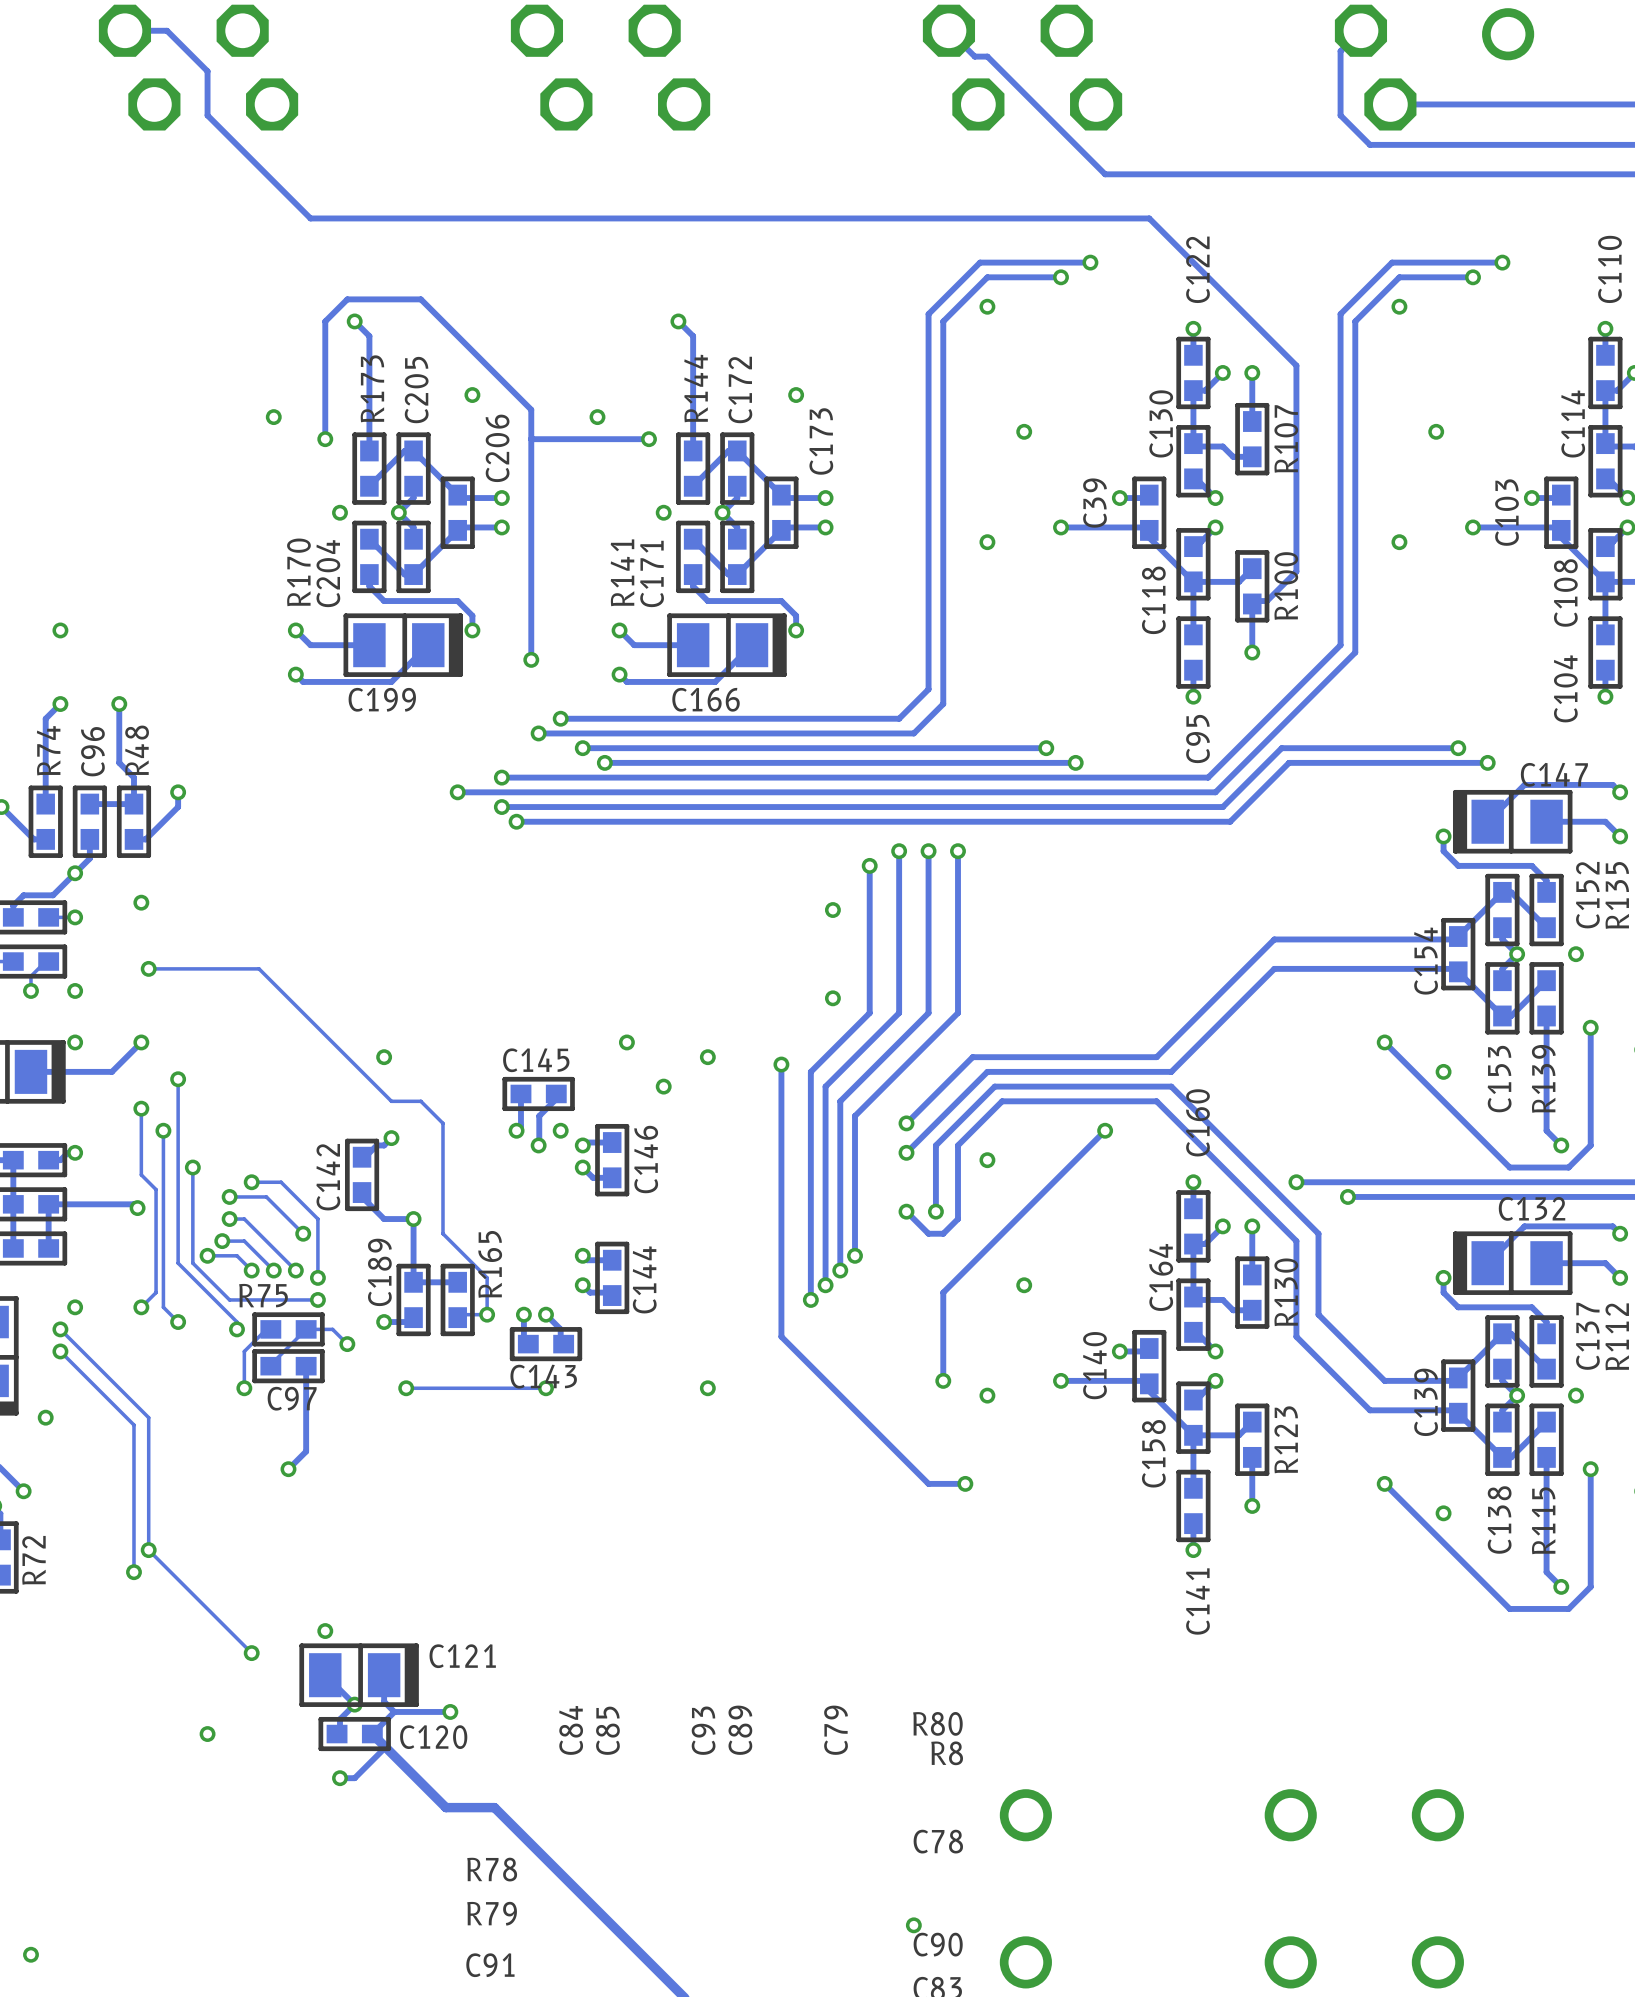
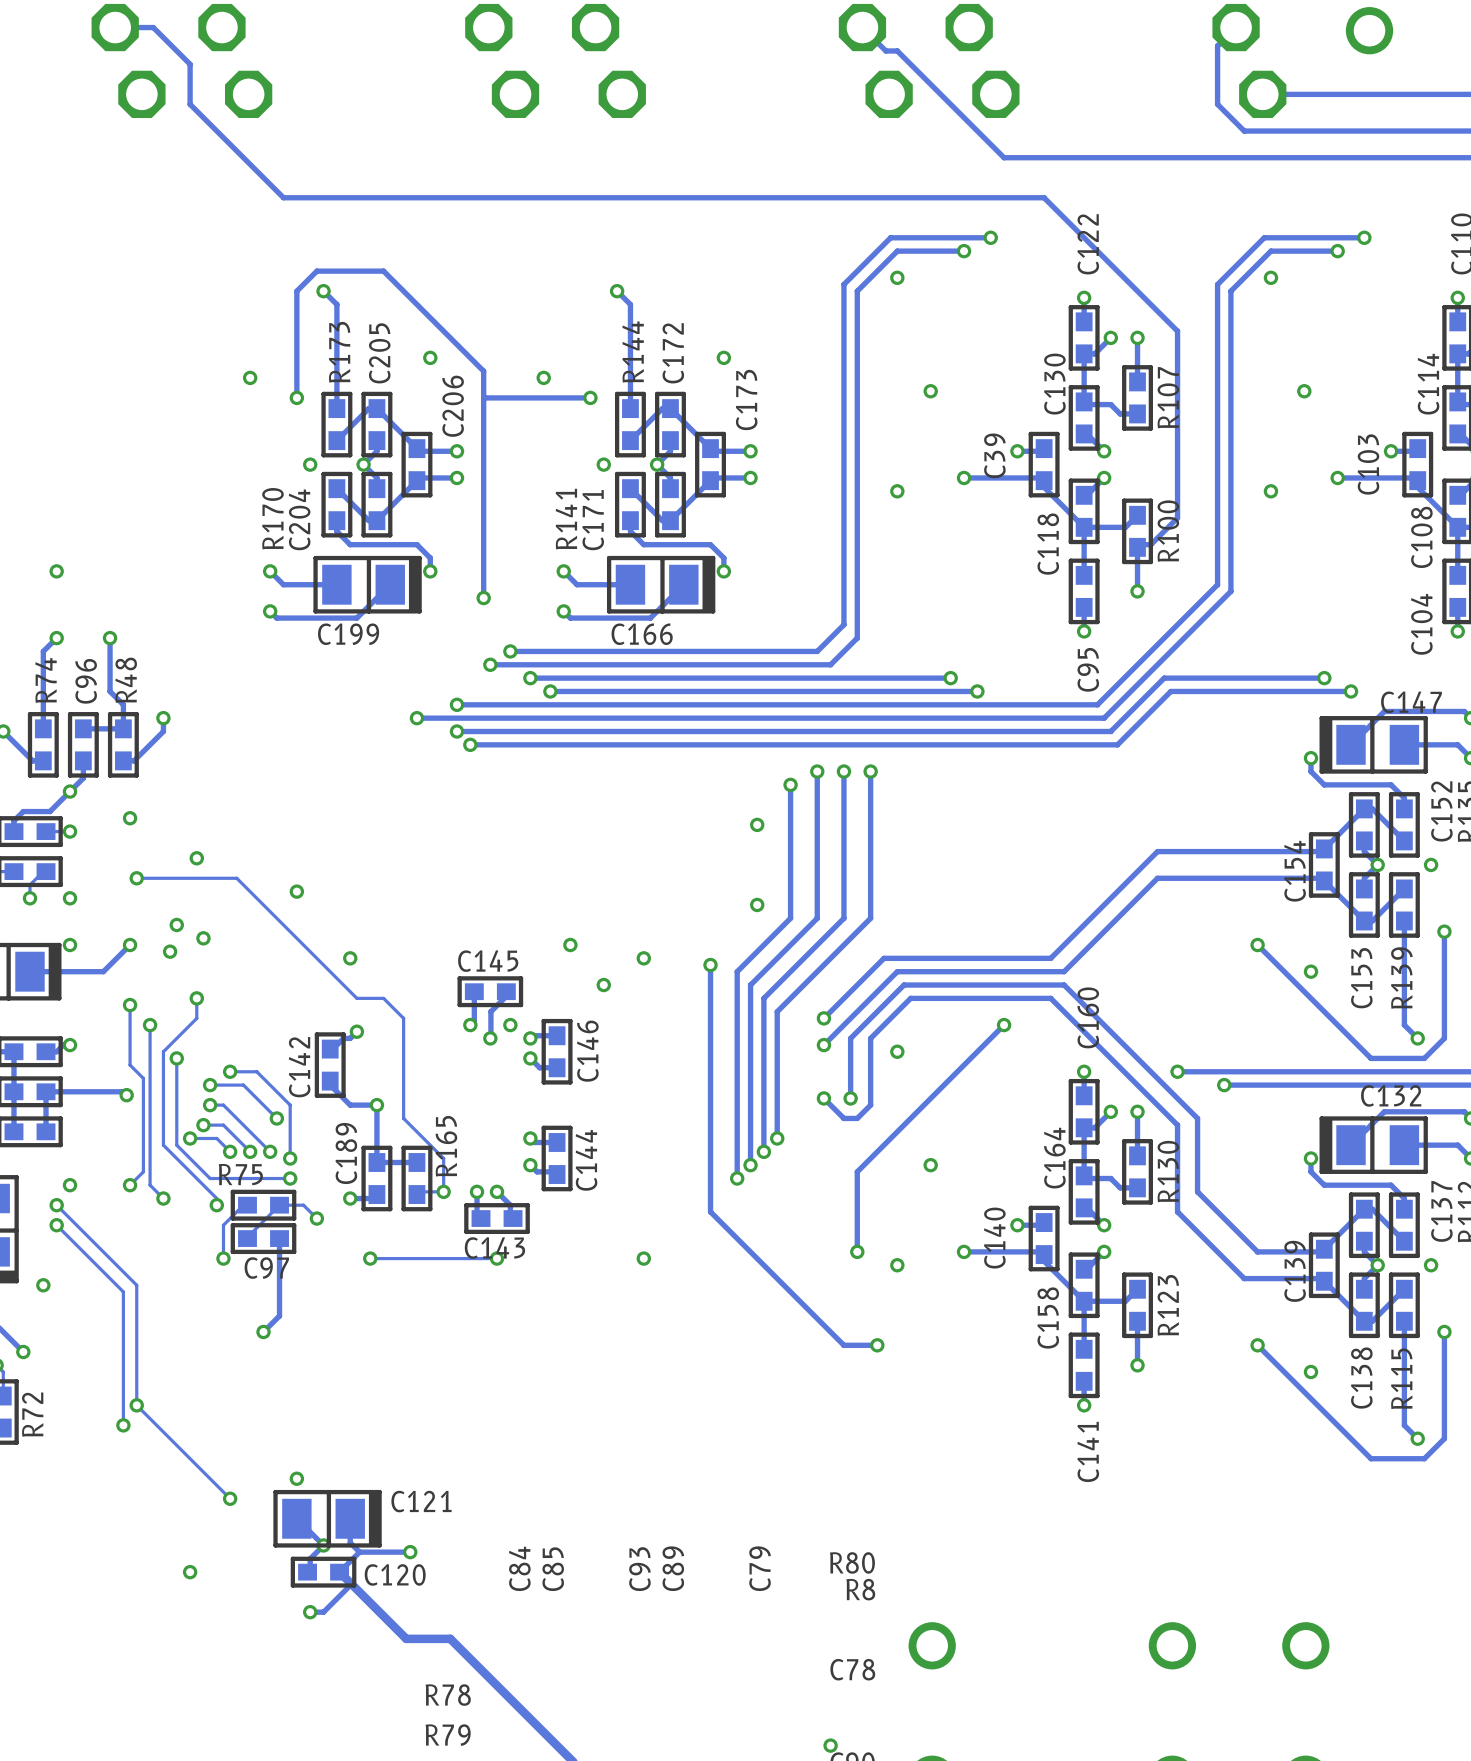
via: none -> (196, 858)
via: none -> (296, 891)
via: none -> (176, 924)
via: none -> (203, 938)
via: none -> (170, 951)
track: (178, 1079) (178, 1160) -> (196, 998) (196, 1018) (163, 1051)
via: (178, 1079) -> none
via: none -> (196, 998)

